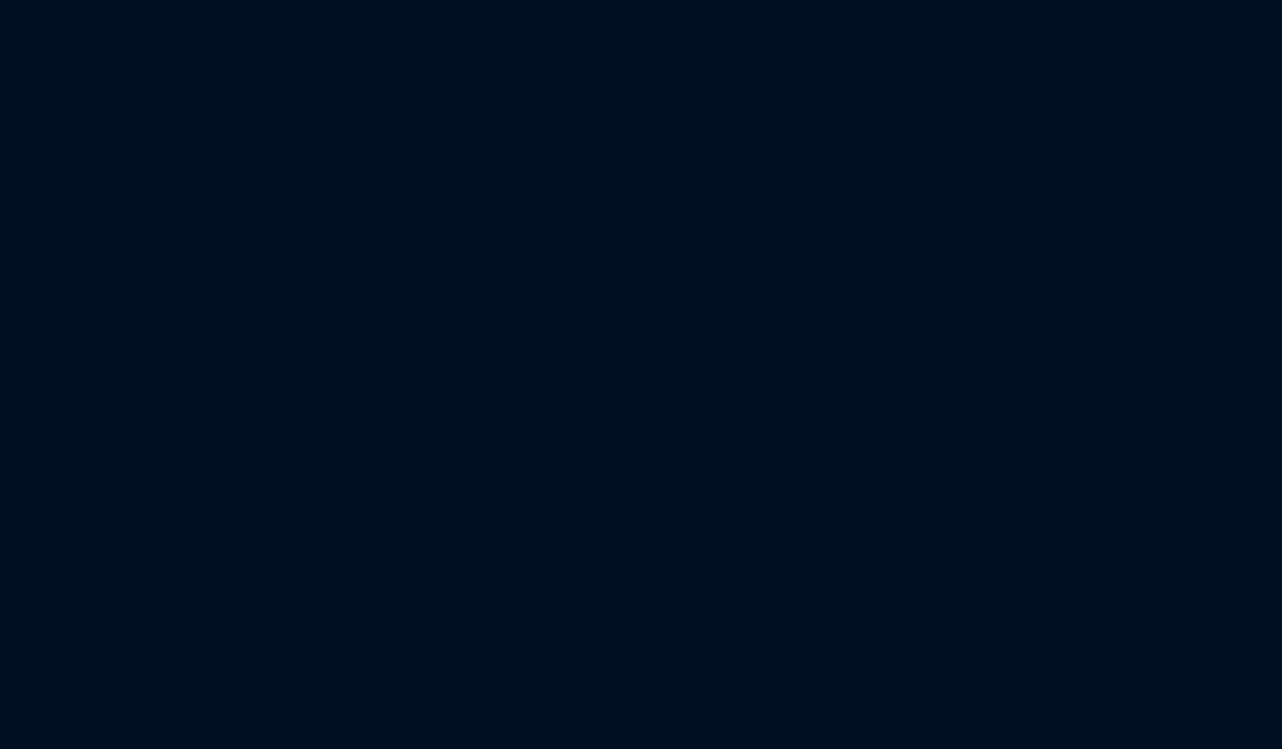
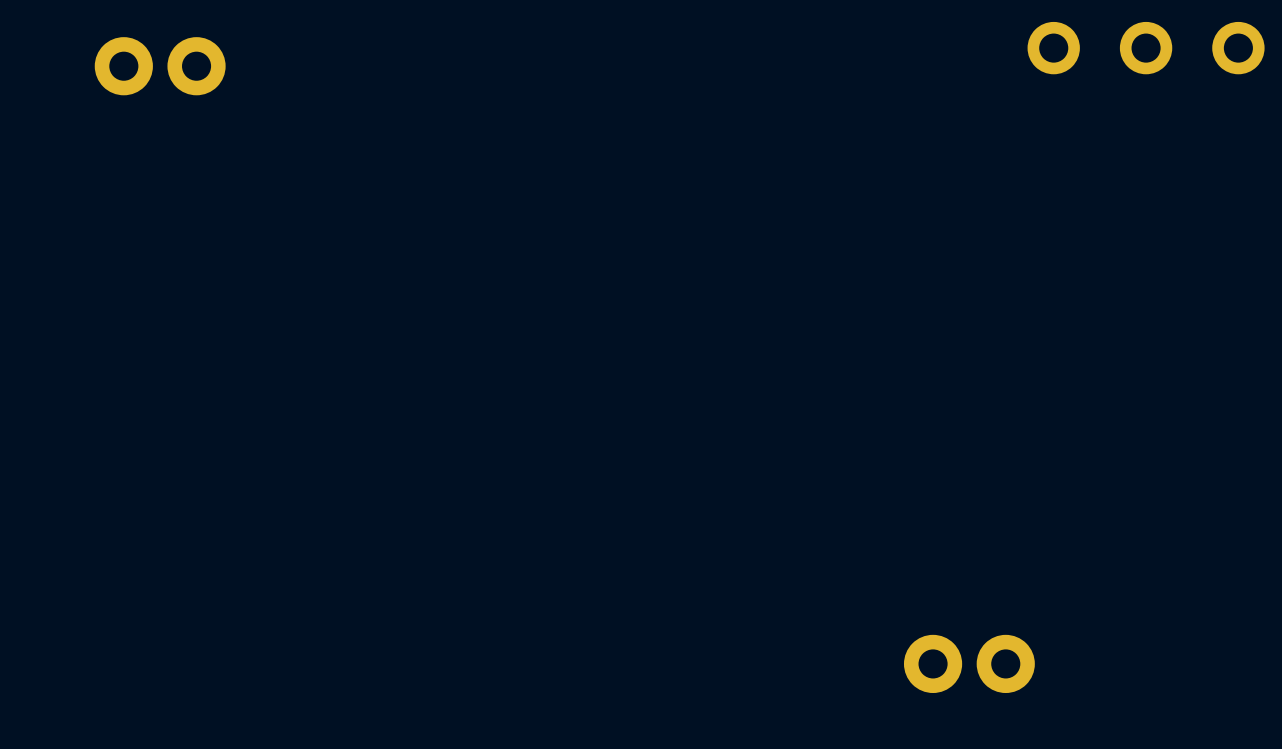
part: none -> (1146, 48)
part: none -> (160, 66)
part: none -> (969, 663)

